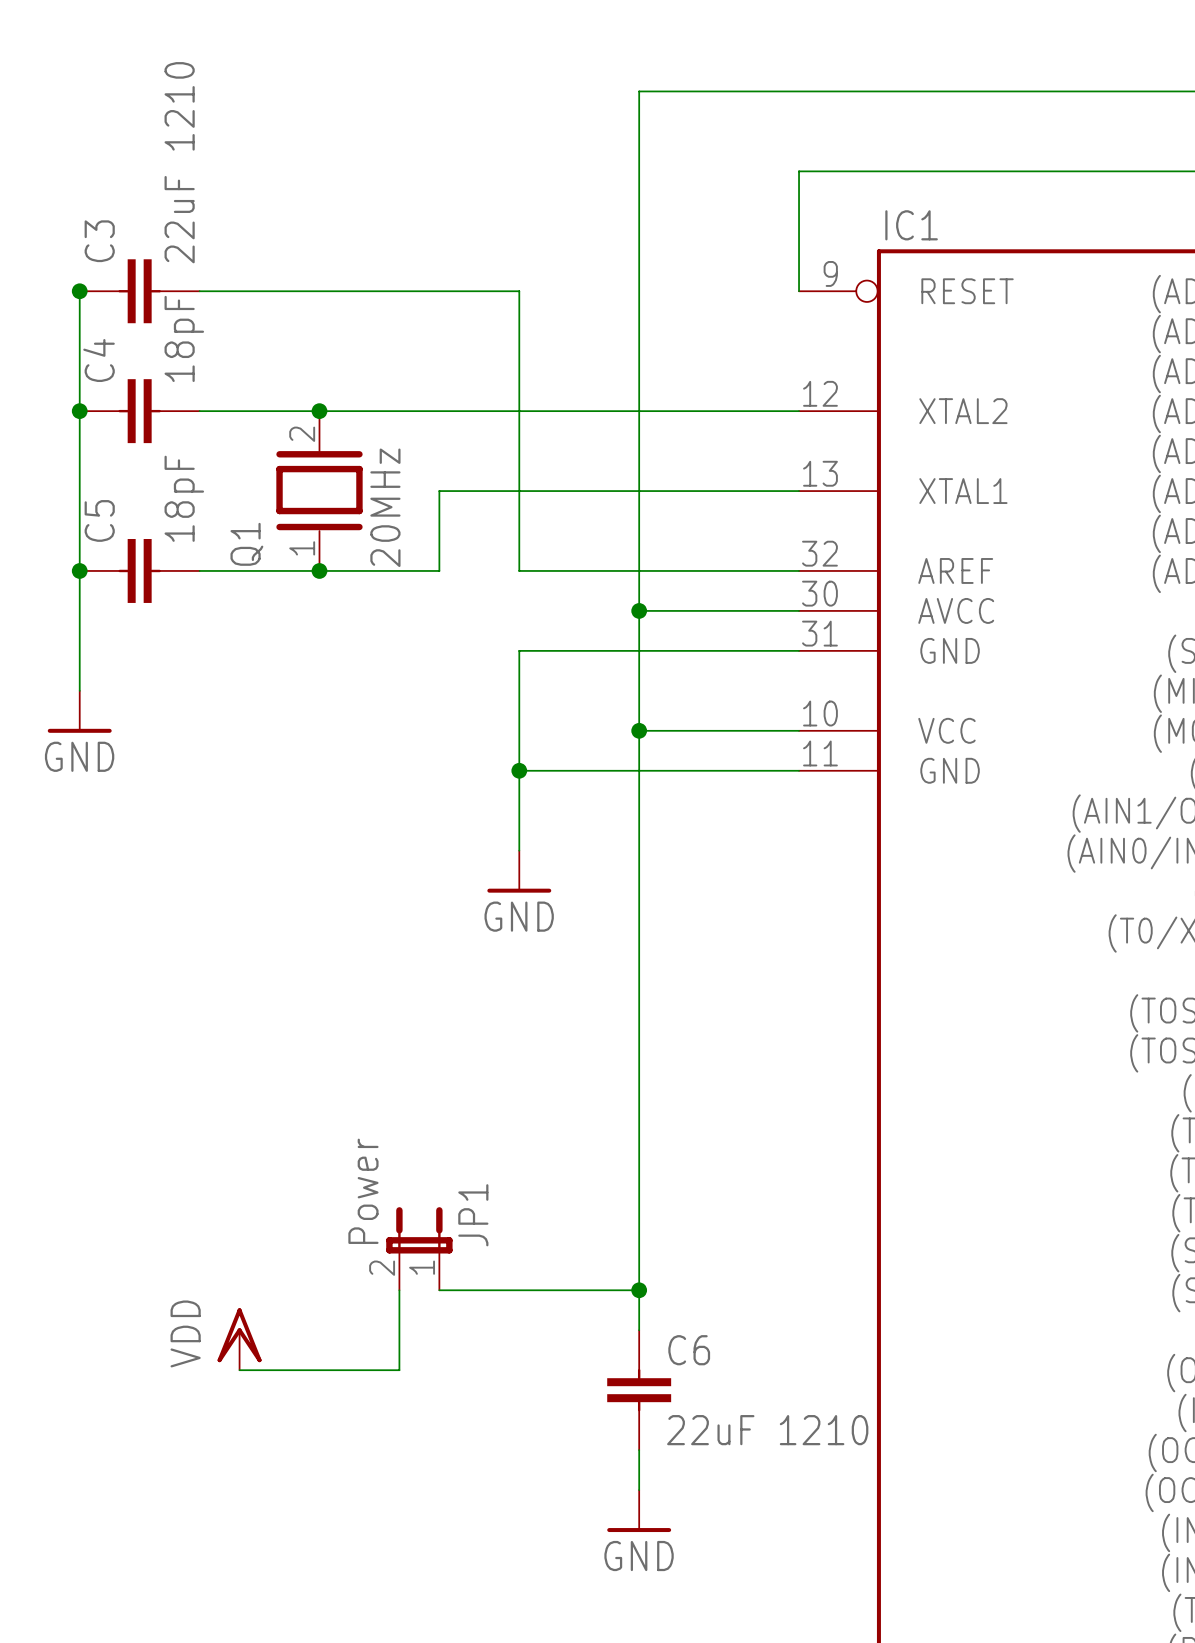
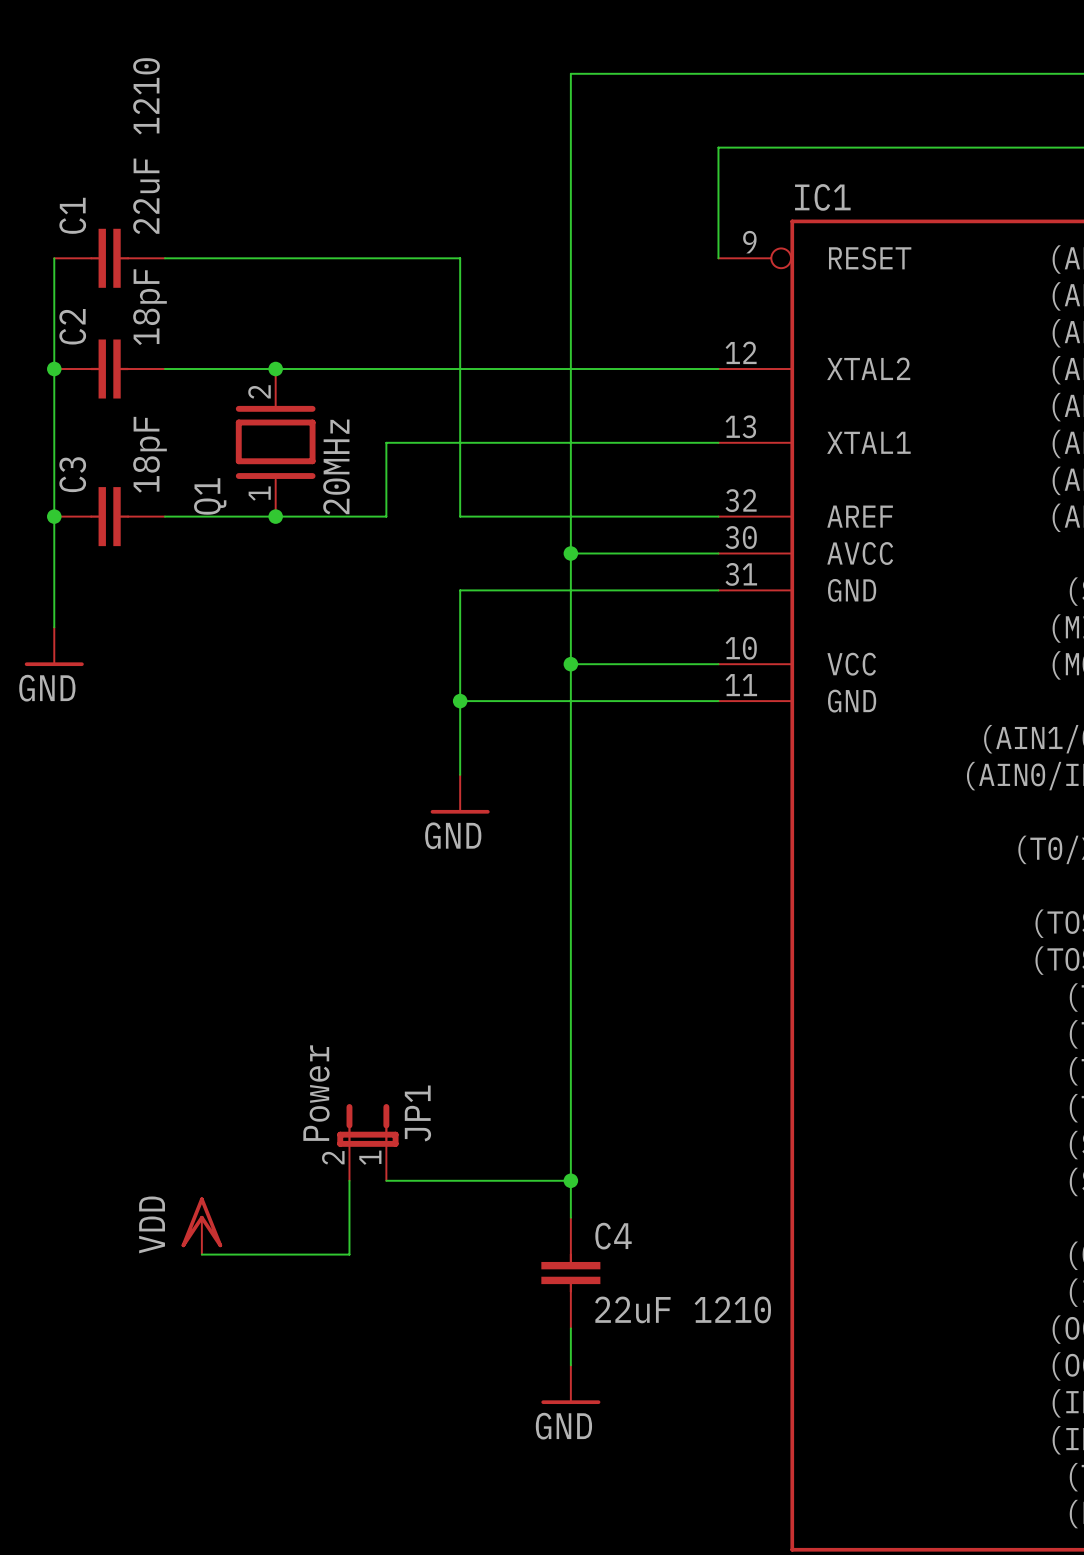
C3 name: C3 (99, 241) -> C1 (72, 215)
junction: (79, 291) -> none
C4 name: C4 (99, 360) -> C2 (72, 326)
C5 name: C5 (99, 520) -> C3 (72, 474)
C6 name: C6 (689, 1350) -> C4 (613, 1236)

